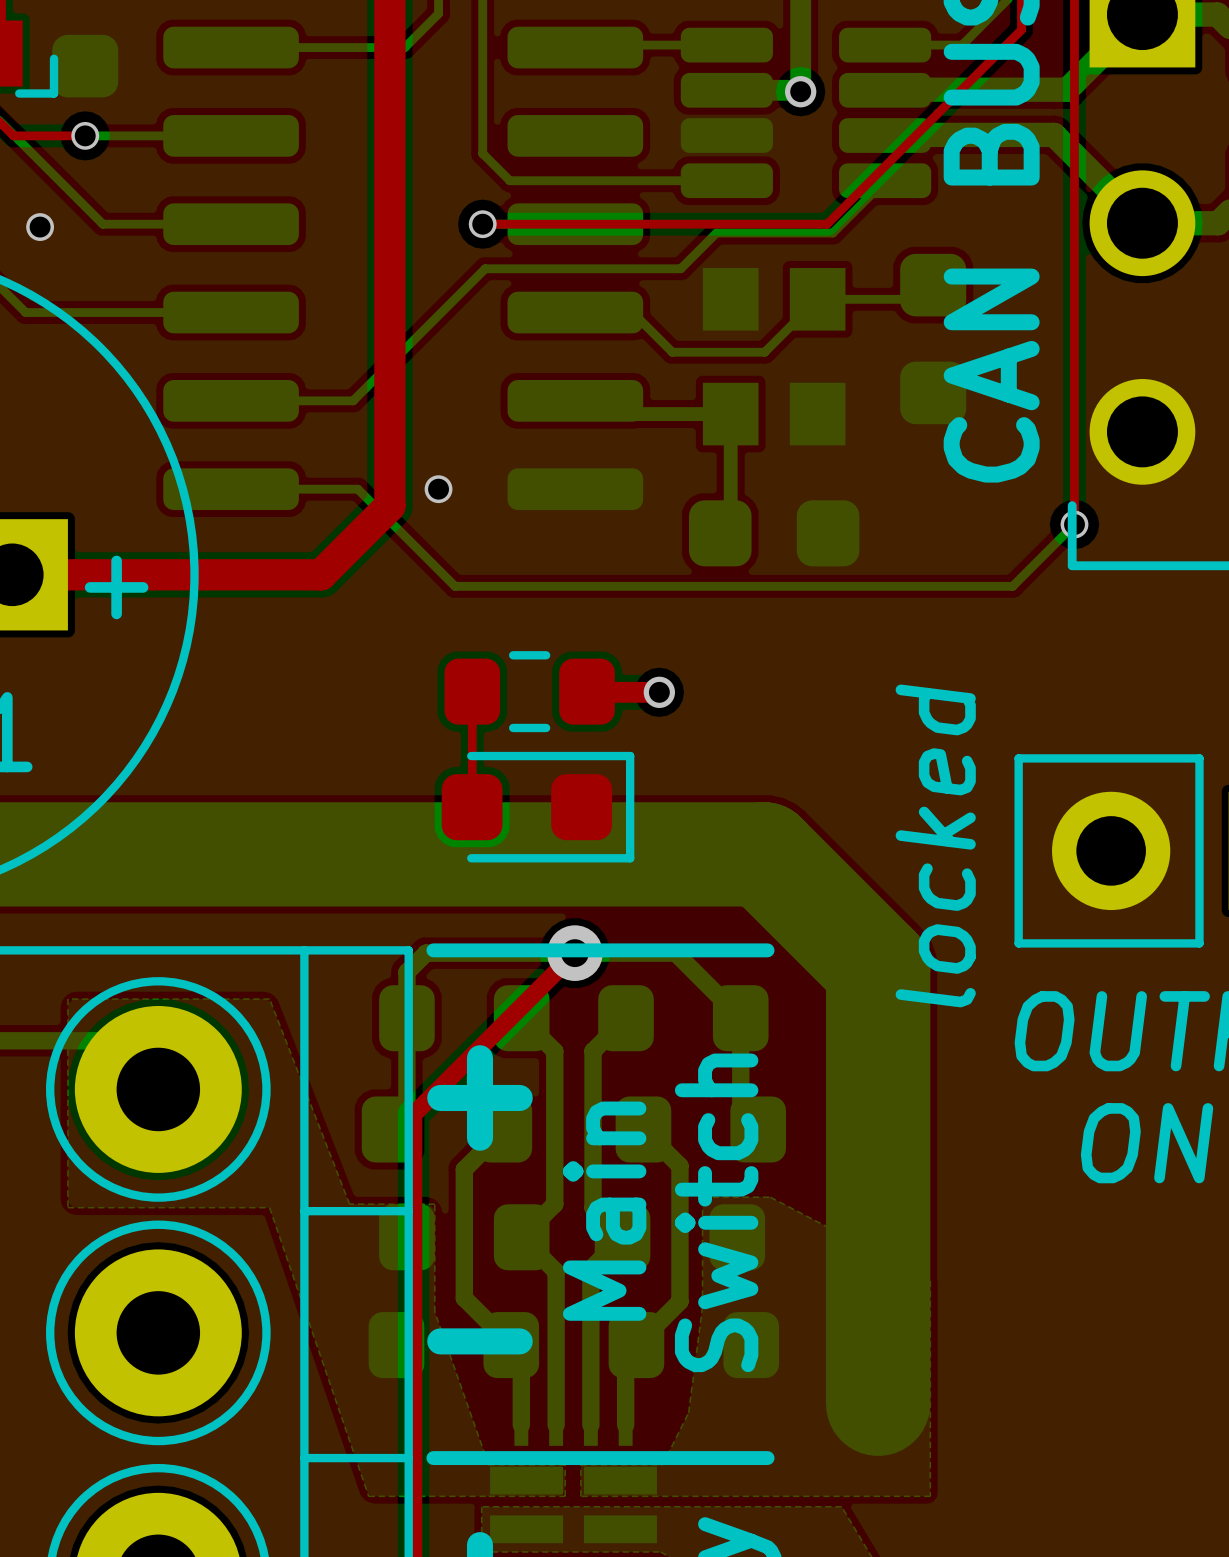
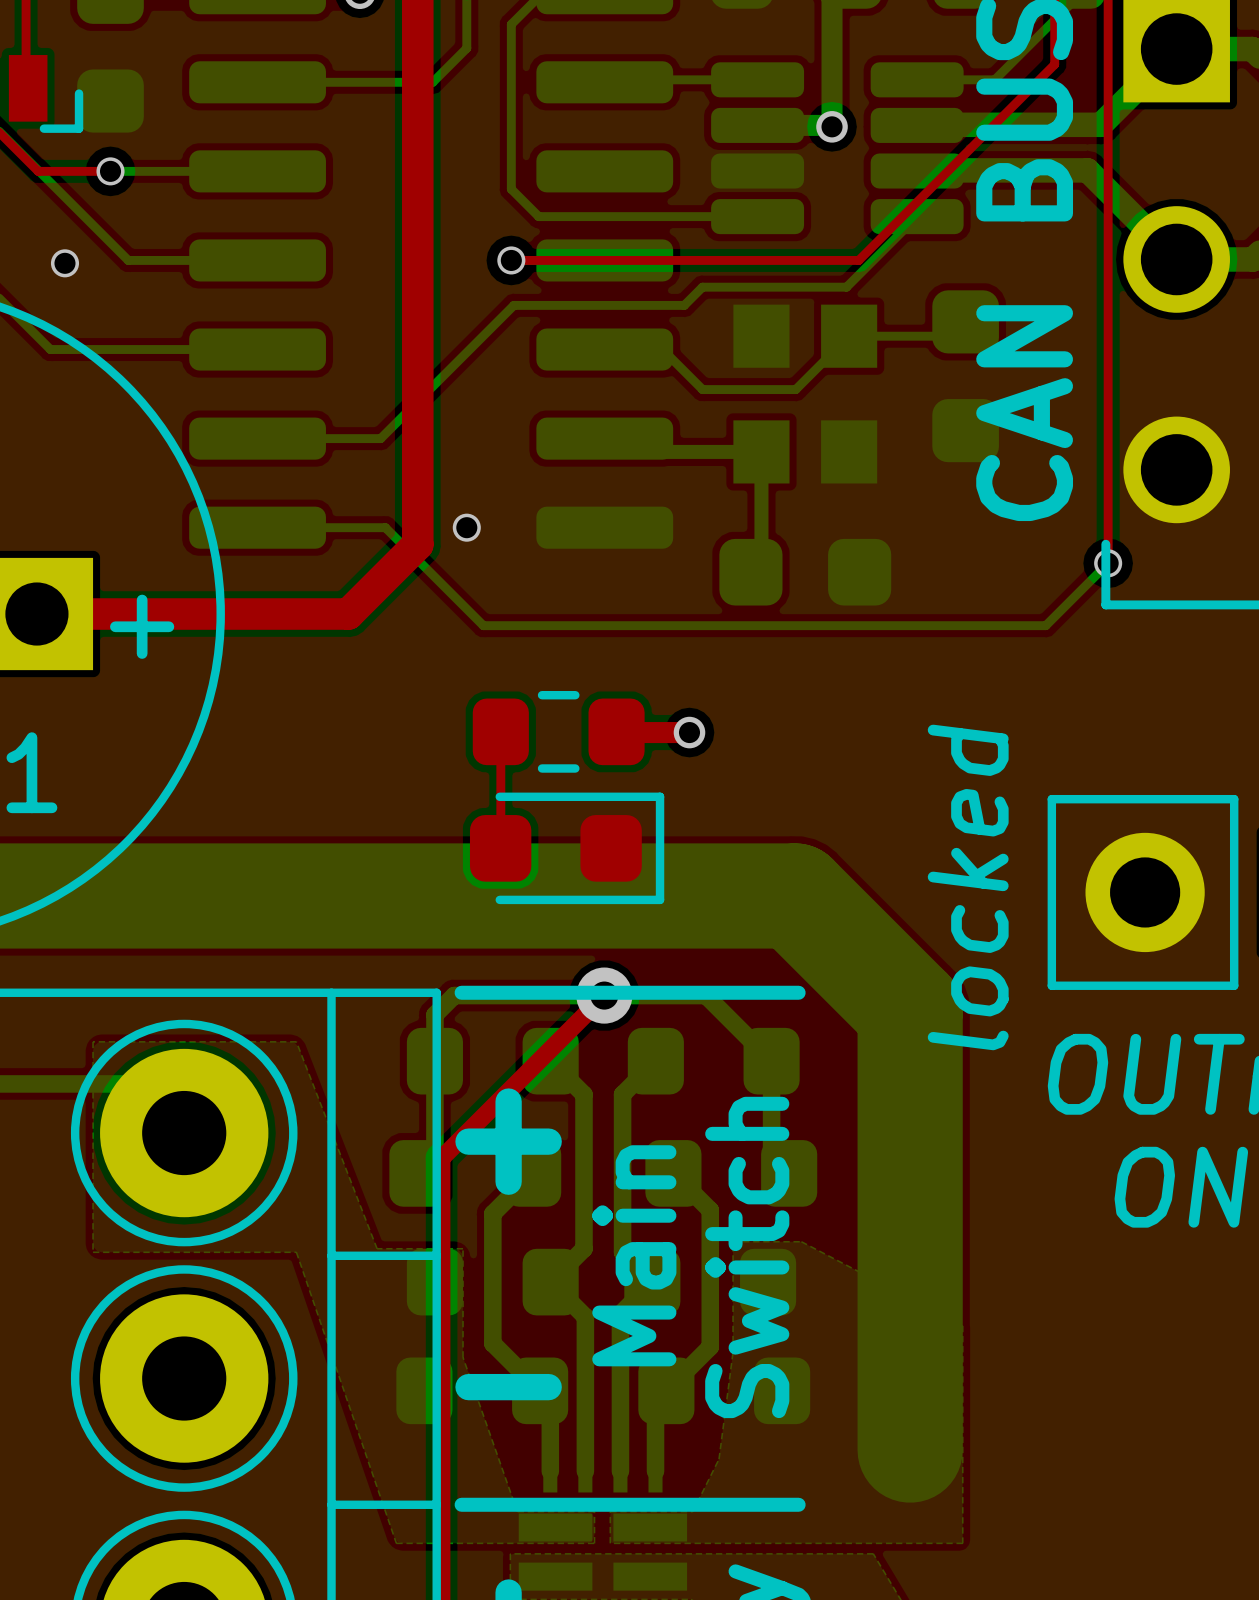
bottom track: (832, 233) (716, 233) (680, 268) (654, 268) -> (864, 269) (846, 287) (702, 287) (684, 305)

